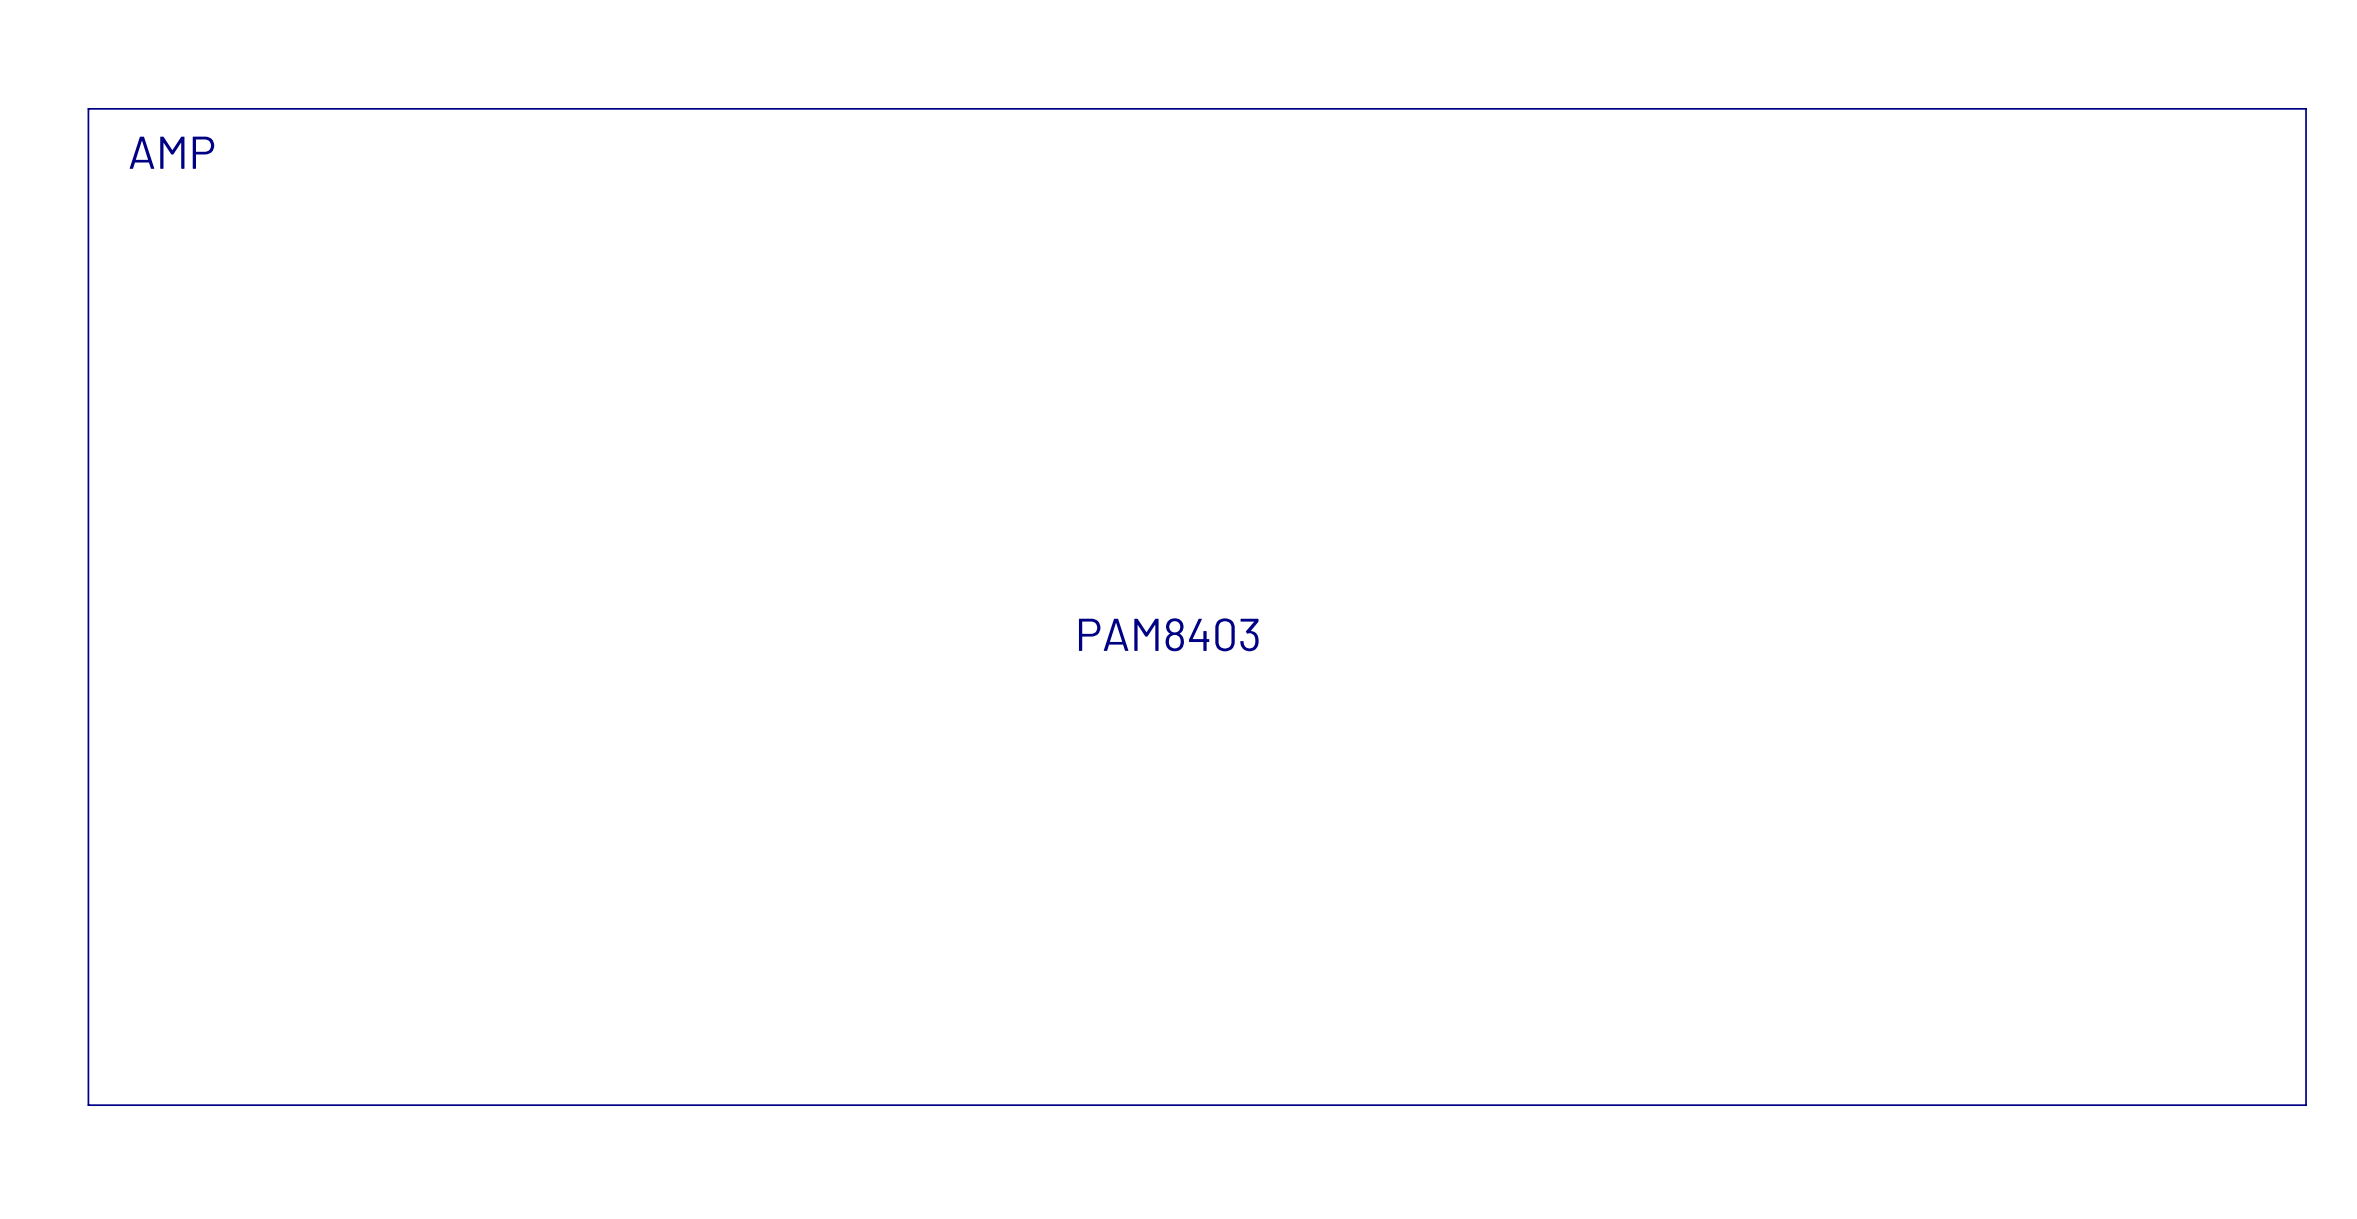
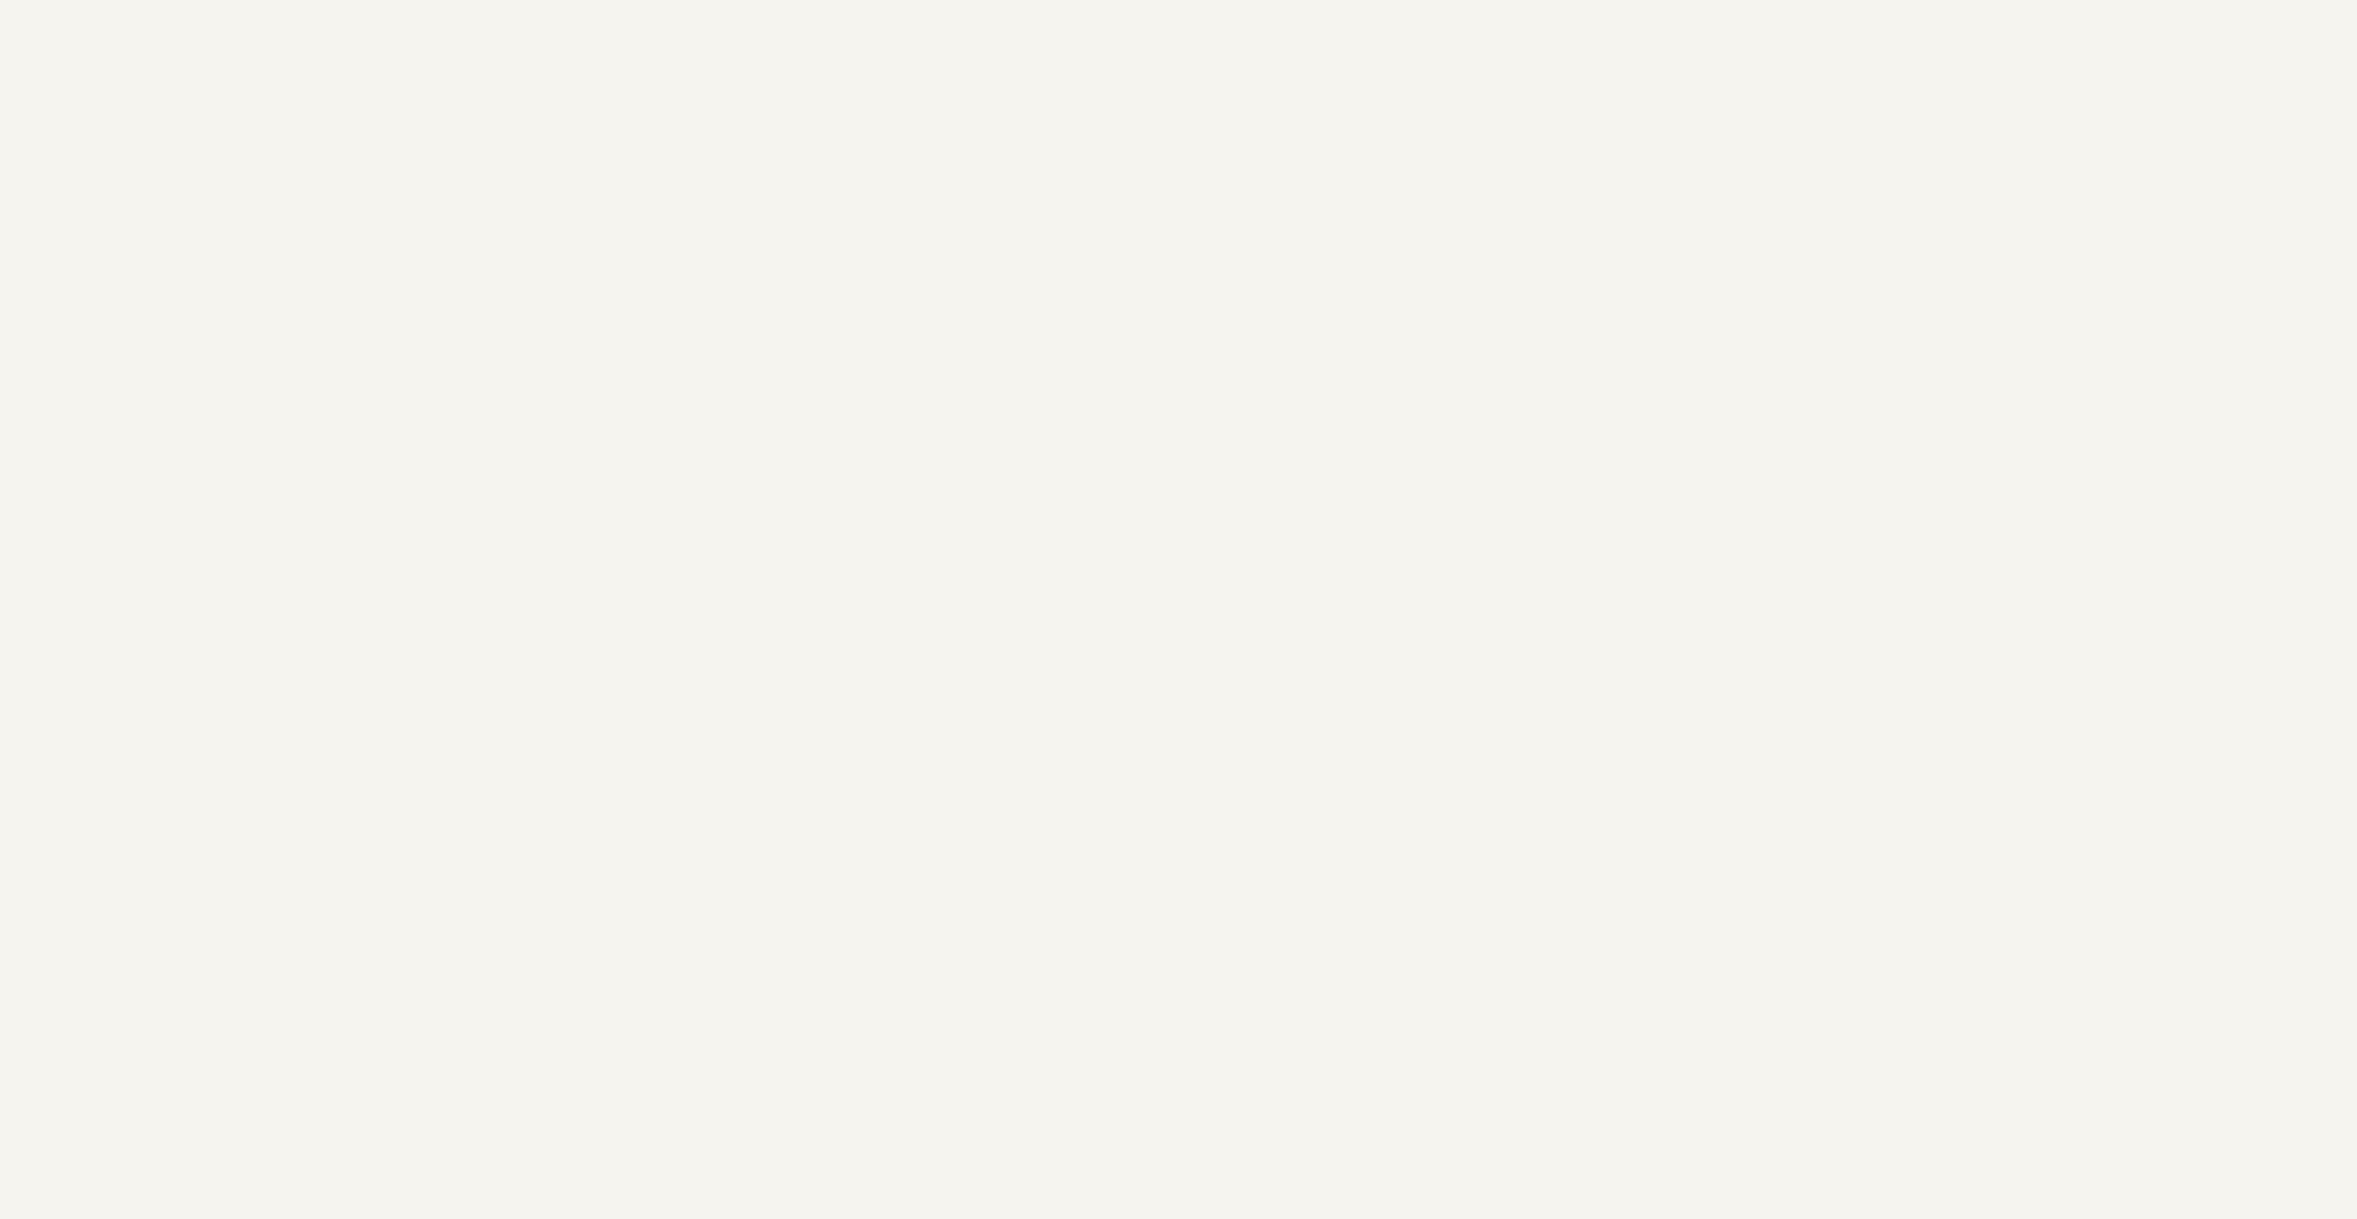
line: (88, 108) (2306, 108) (2306, 1105) (88, 1105) (88, 108) -> none
text: AMP (171, 152) -> none
text: PAM8403 (1168, 634) -> none

